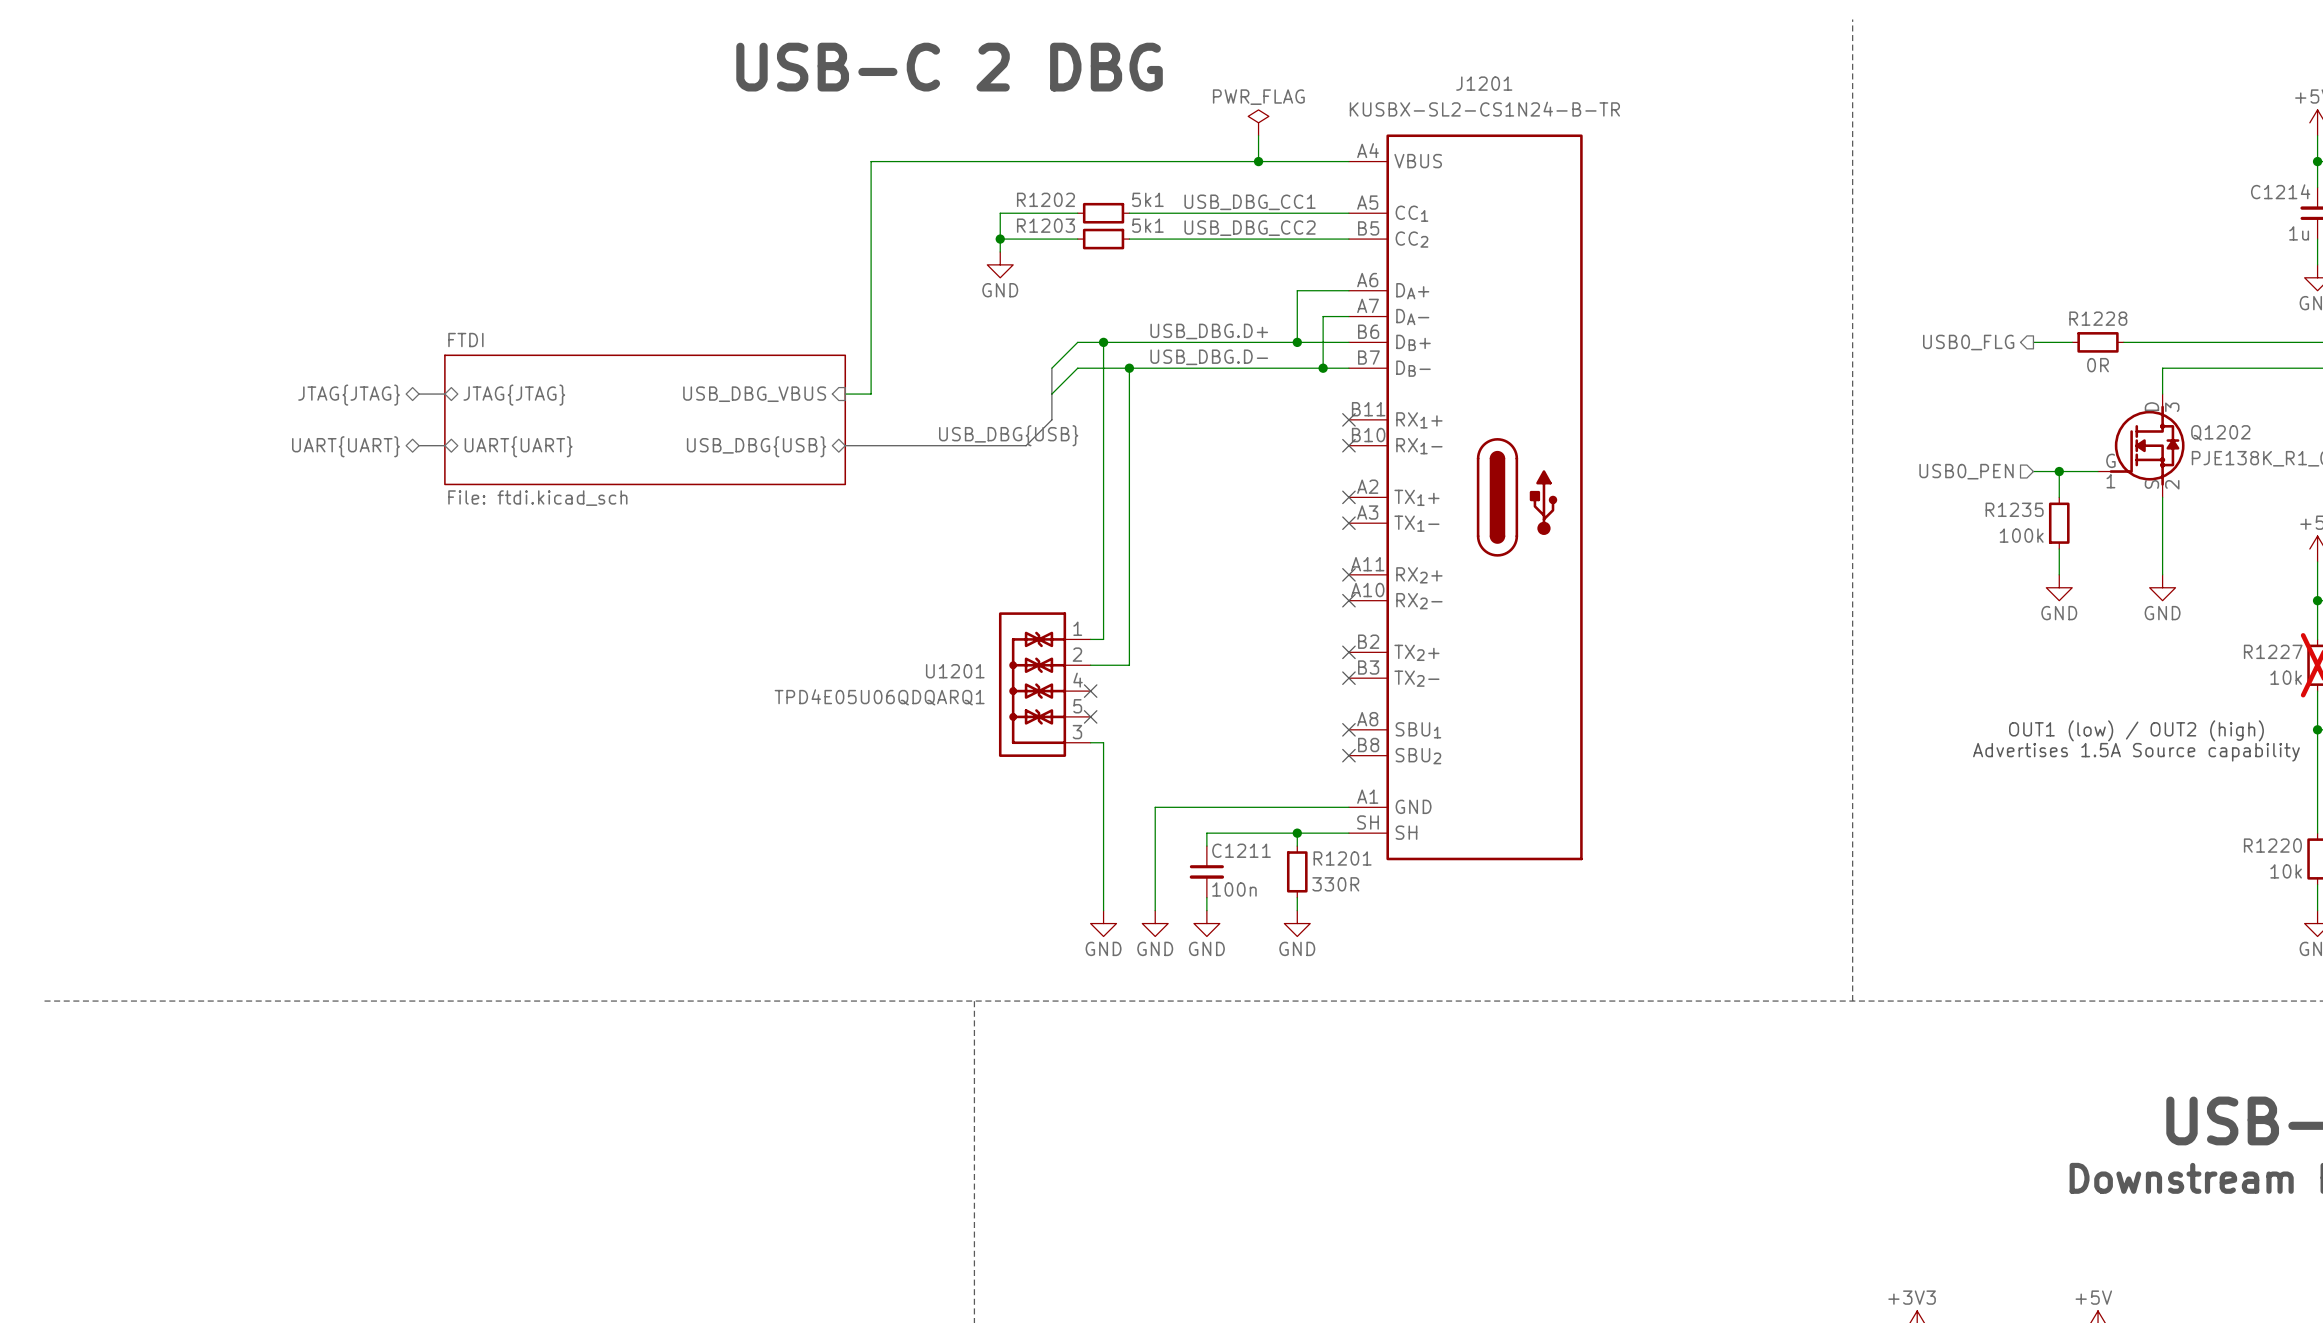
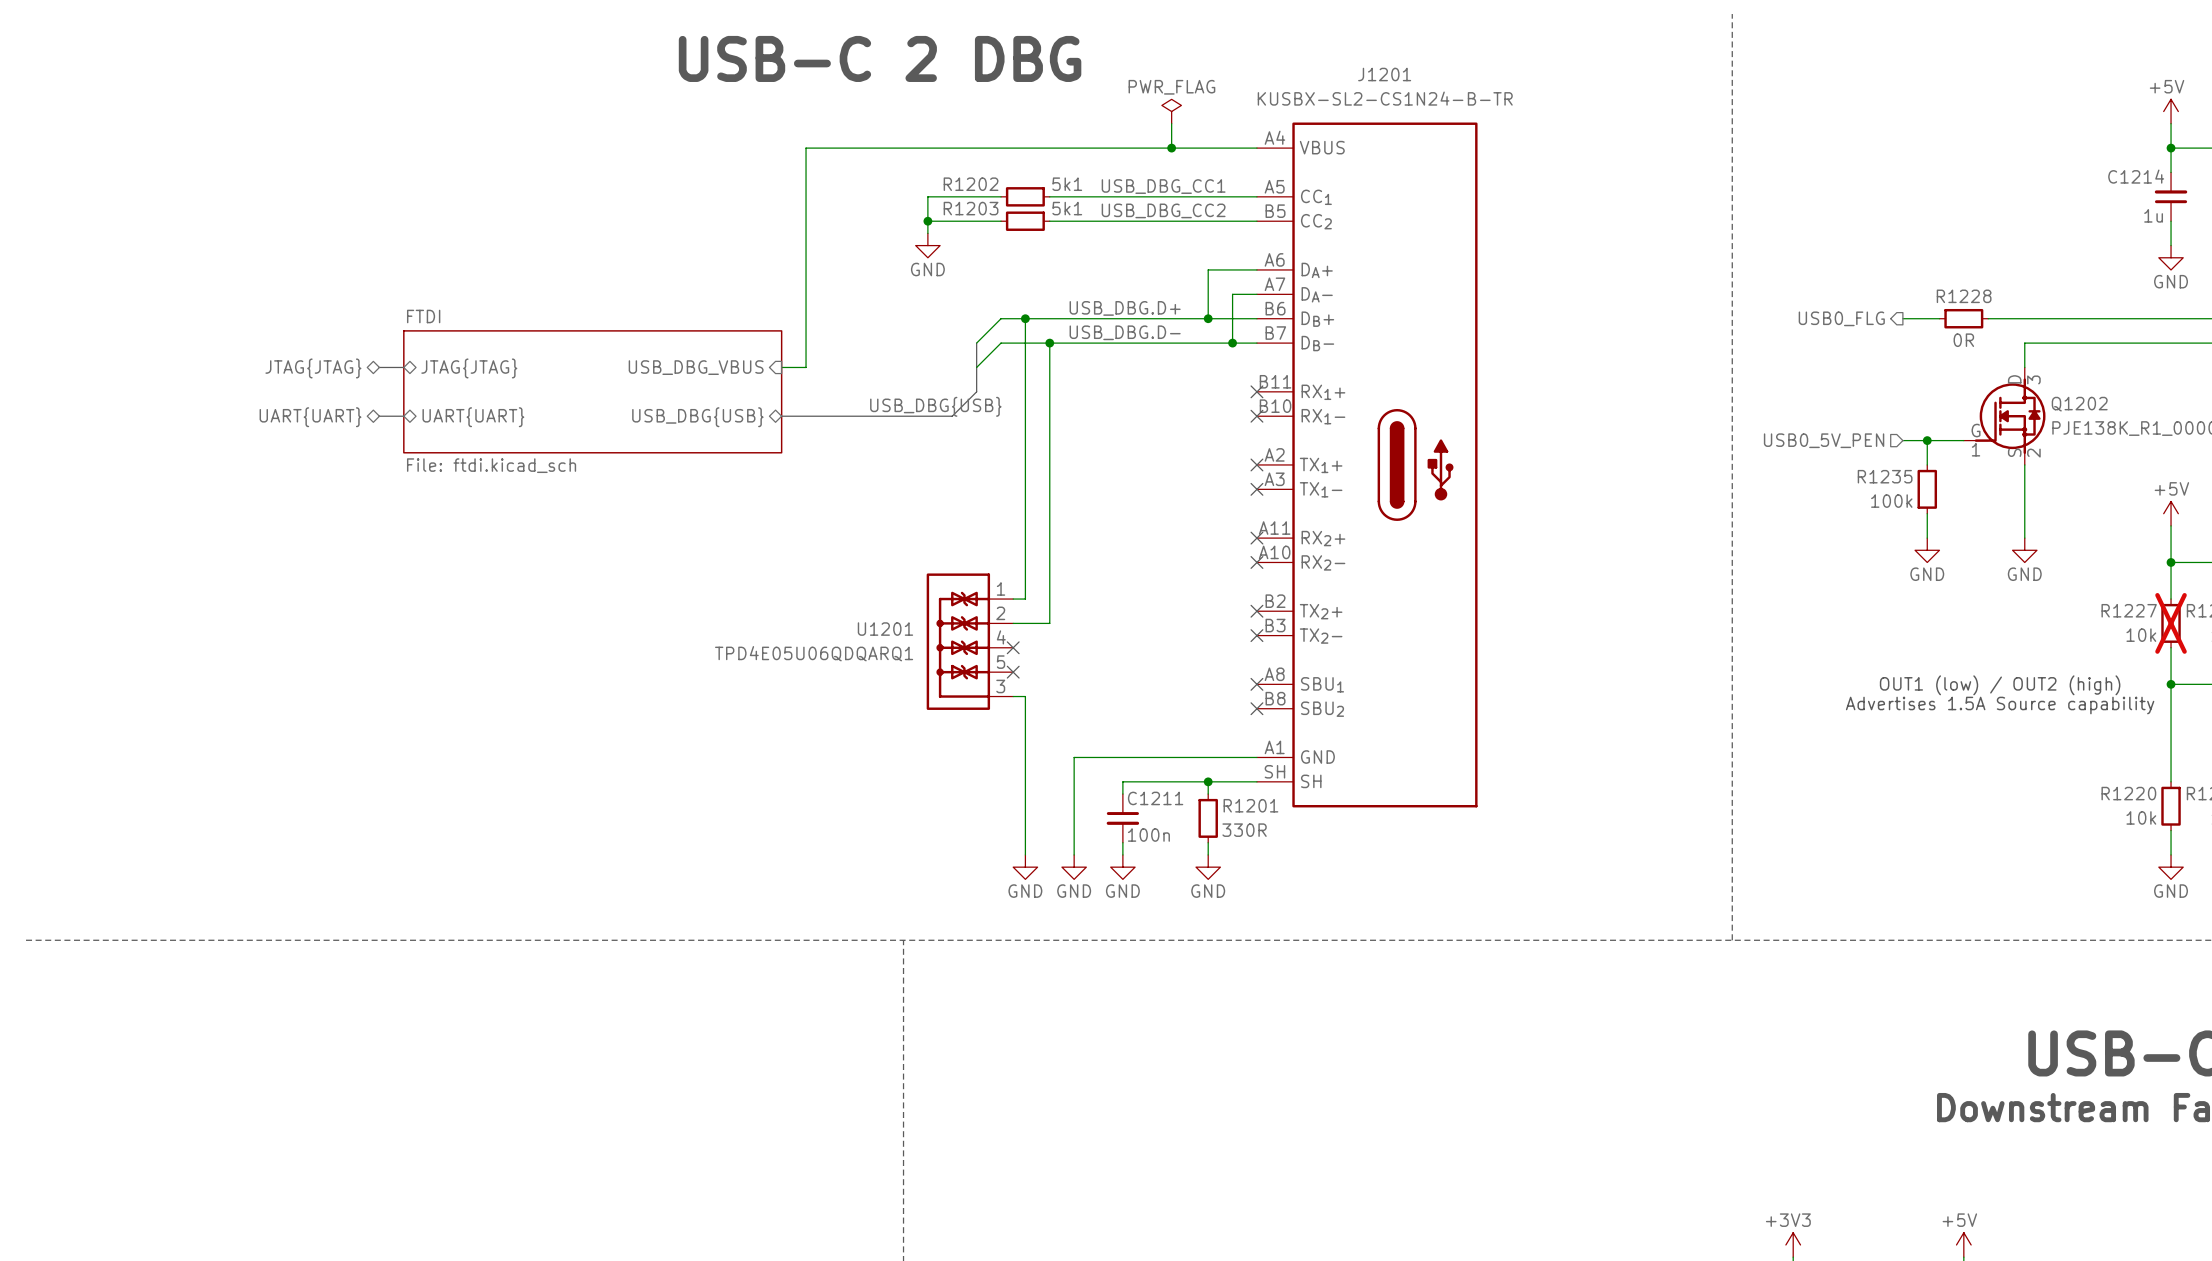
hierarchical label: USB0_PEN (1966, 471) -> USB0_5V_PEN (1824, 440)

